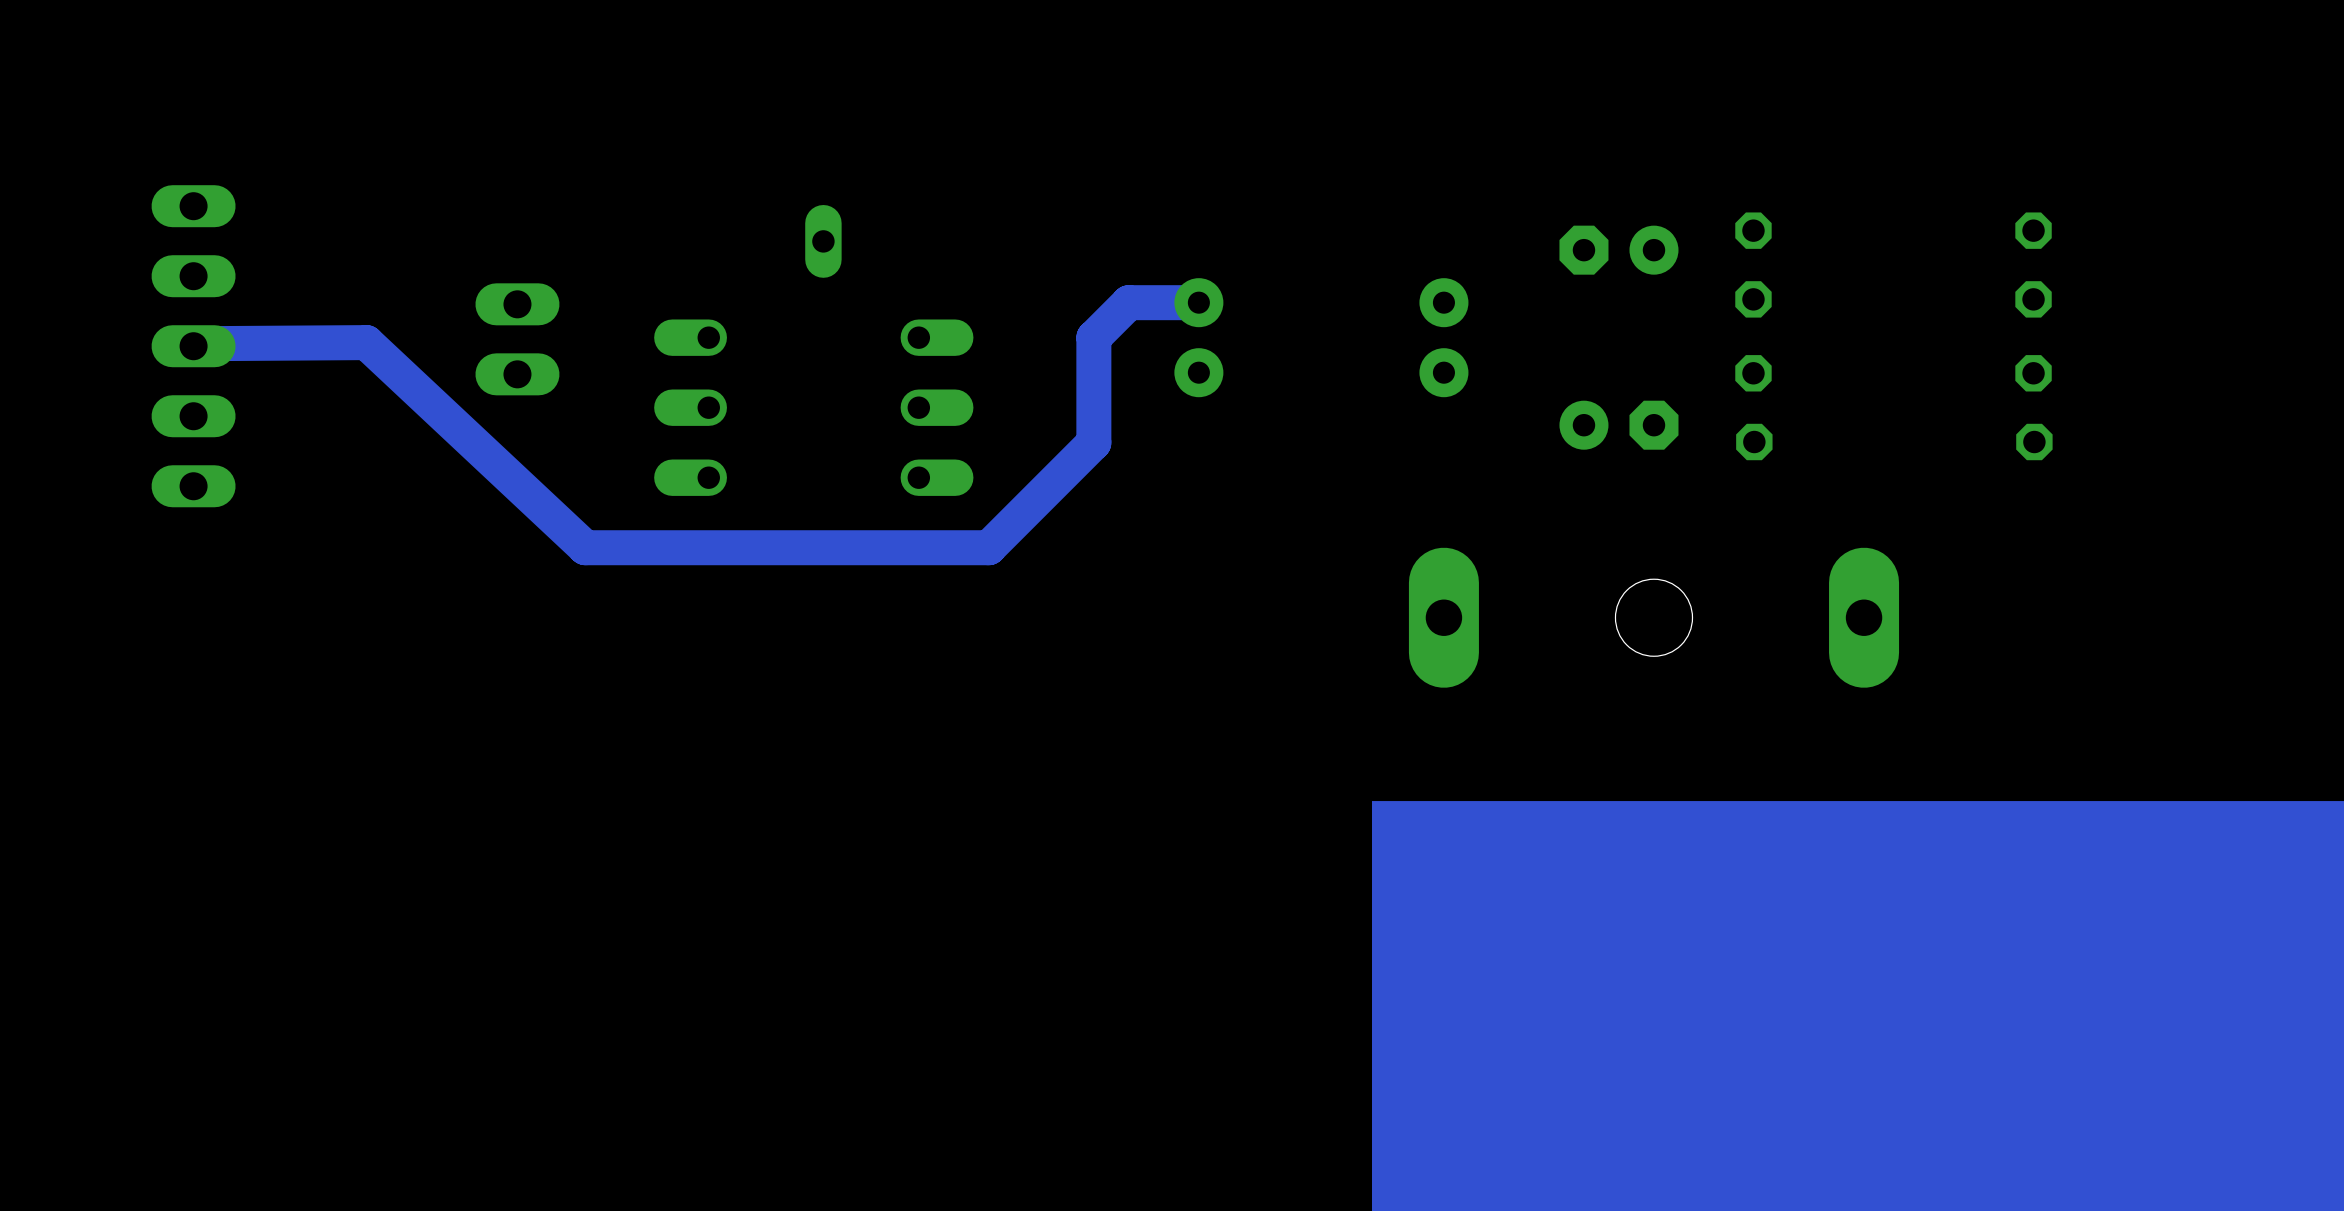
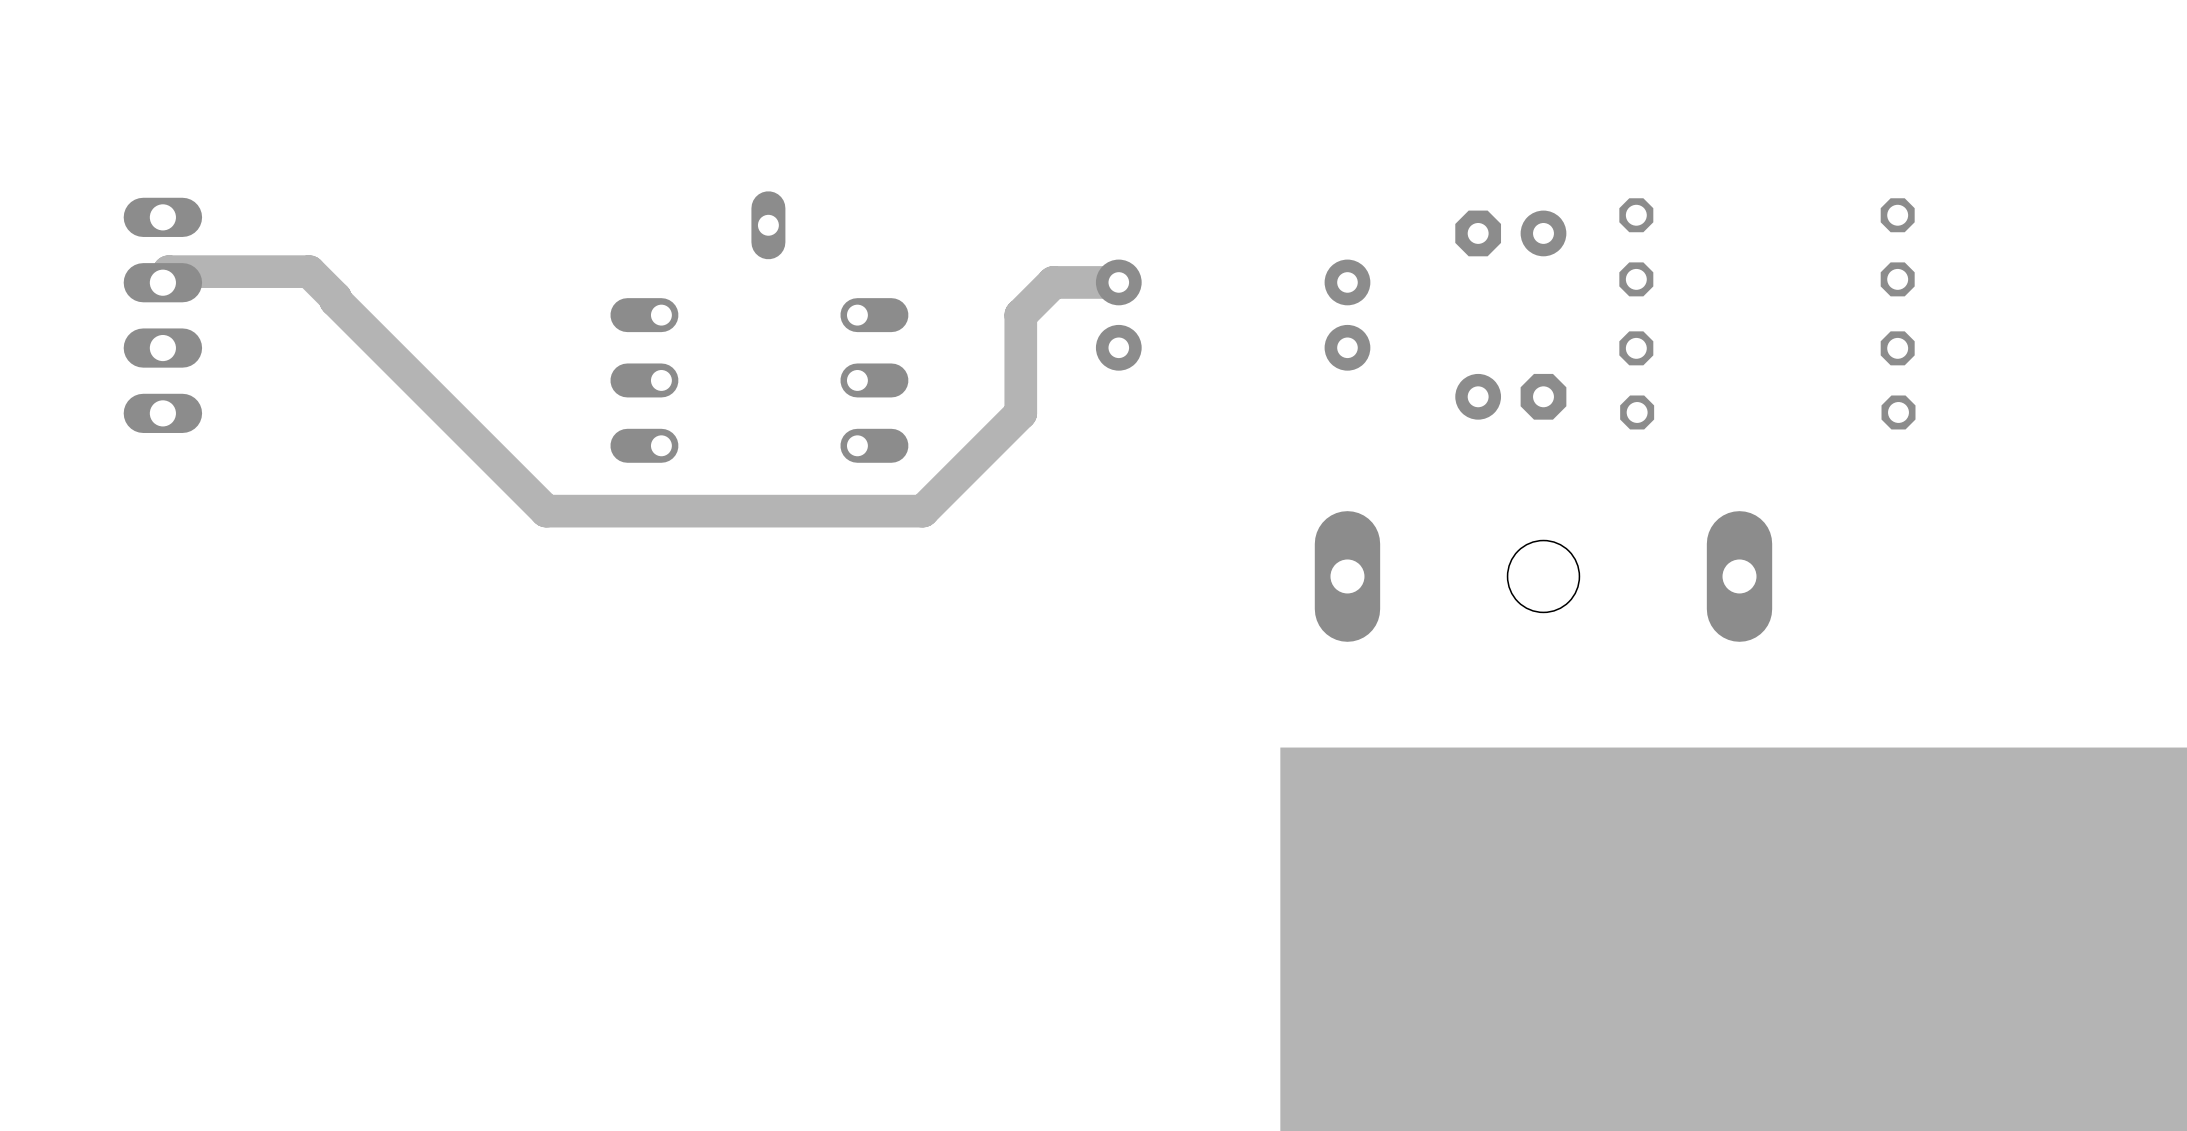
part footprint: [151, 185, 236, 508] -> [123, 197, 203, 433]
part: (517, 339) -> none
track: (193, 346) (201, 346) (187, 343) (366, 342) (585, 547) -> (162, 282) (168, 271) (309, 271) (335, 297) (335, 300) (546, 511)

